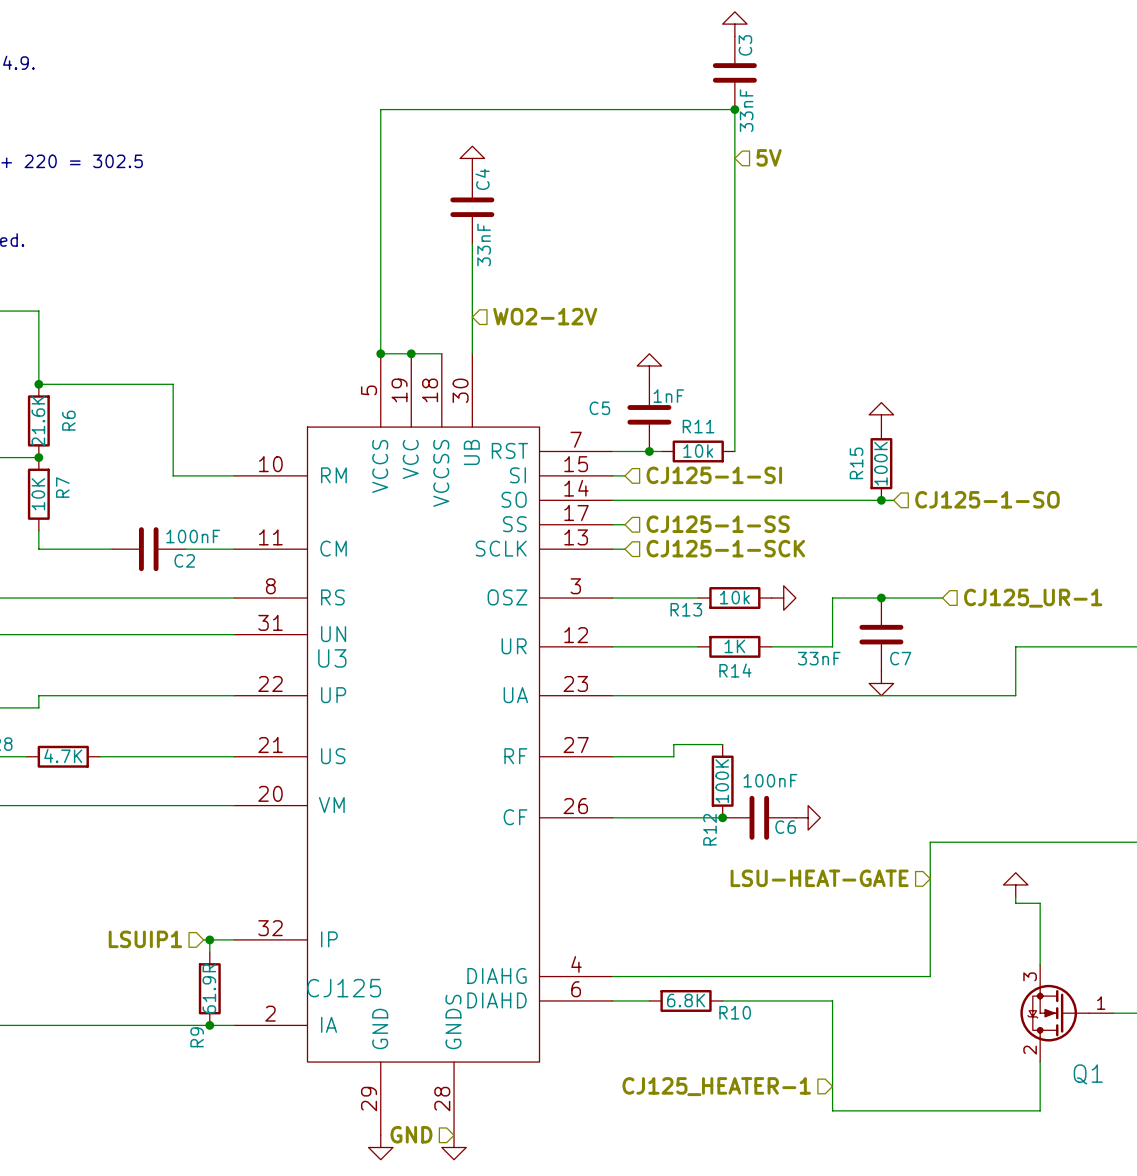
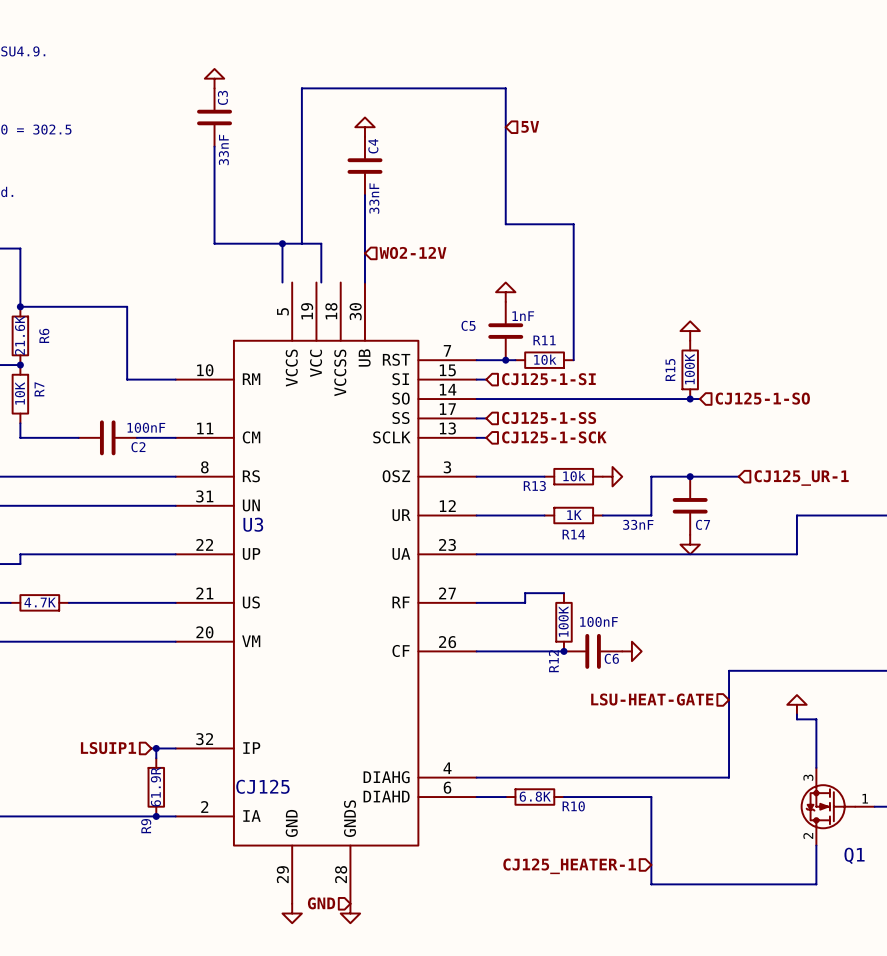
power symbol: (734, 24) -> none
C3 position: (734, 72) -> (214, 117)
power symbol: none -> (214, 78)
wire: (392, 109) (380, 109) (380, 353) (441, 353) -> (301, 88) (301, 243)
wire: (649, 109) (734, 109) (734, 280) -> (505, 88) (505, 224) (573, 224)
junction: (734, 109) -> none
hierarchical label position: 5V (769, 157) -> 5V (530, 126)
wire: none -> (214, 146) (214, 243) (321, 243) (321, 282)
wire: none -> (282, 243) (282, 282)
junction: none -> (282, 243)
junction: (380, 353) -> none
junction: (411, 353) -> none

